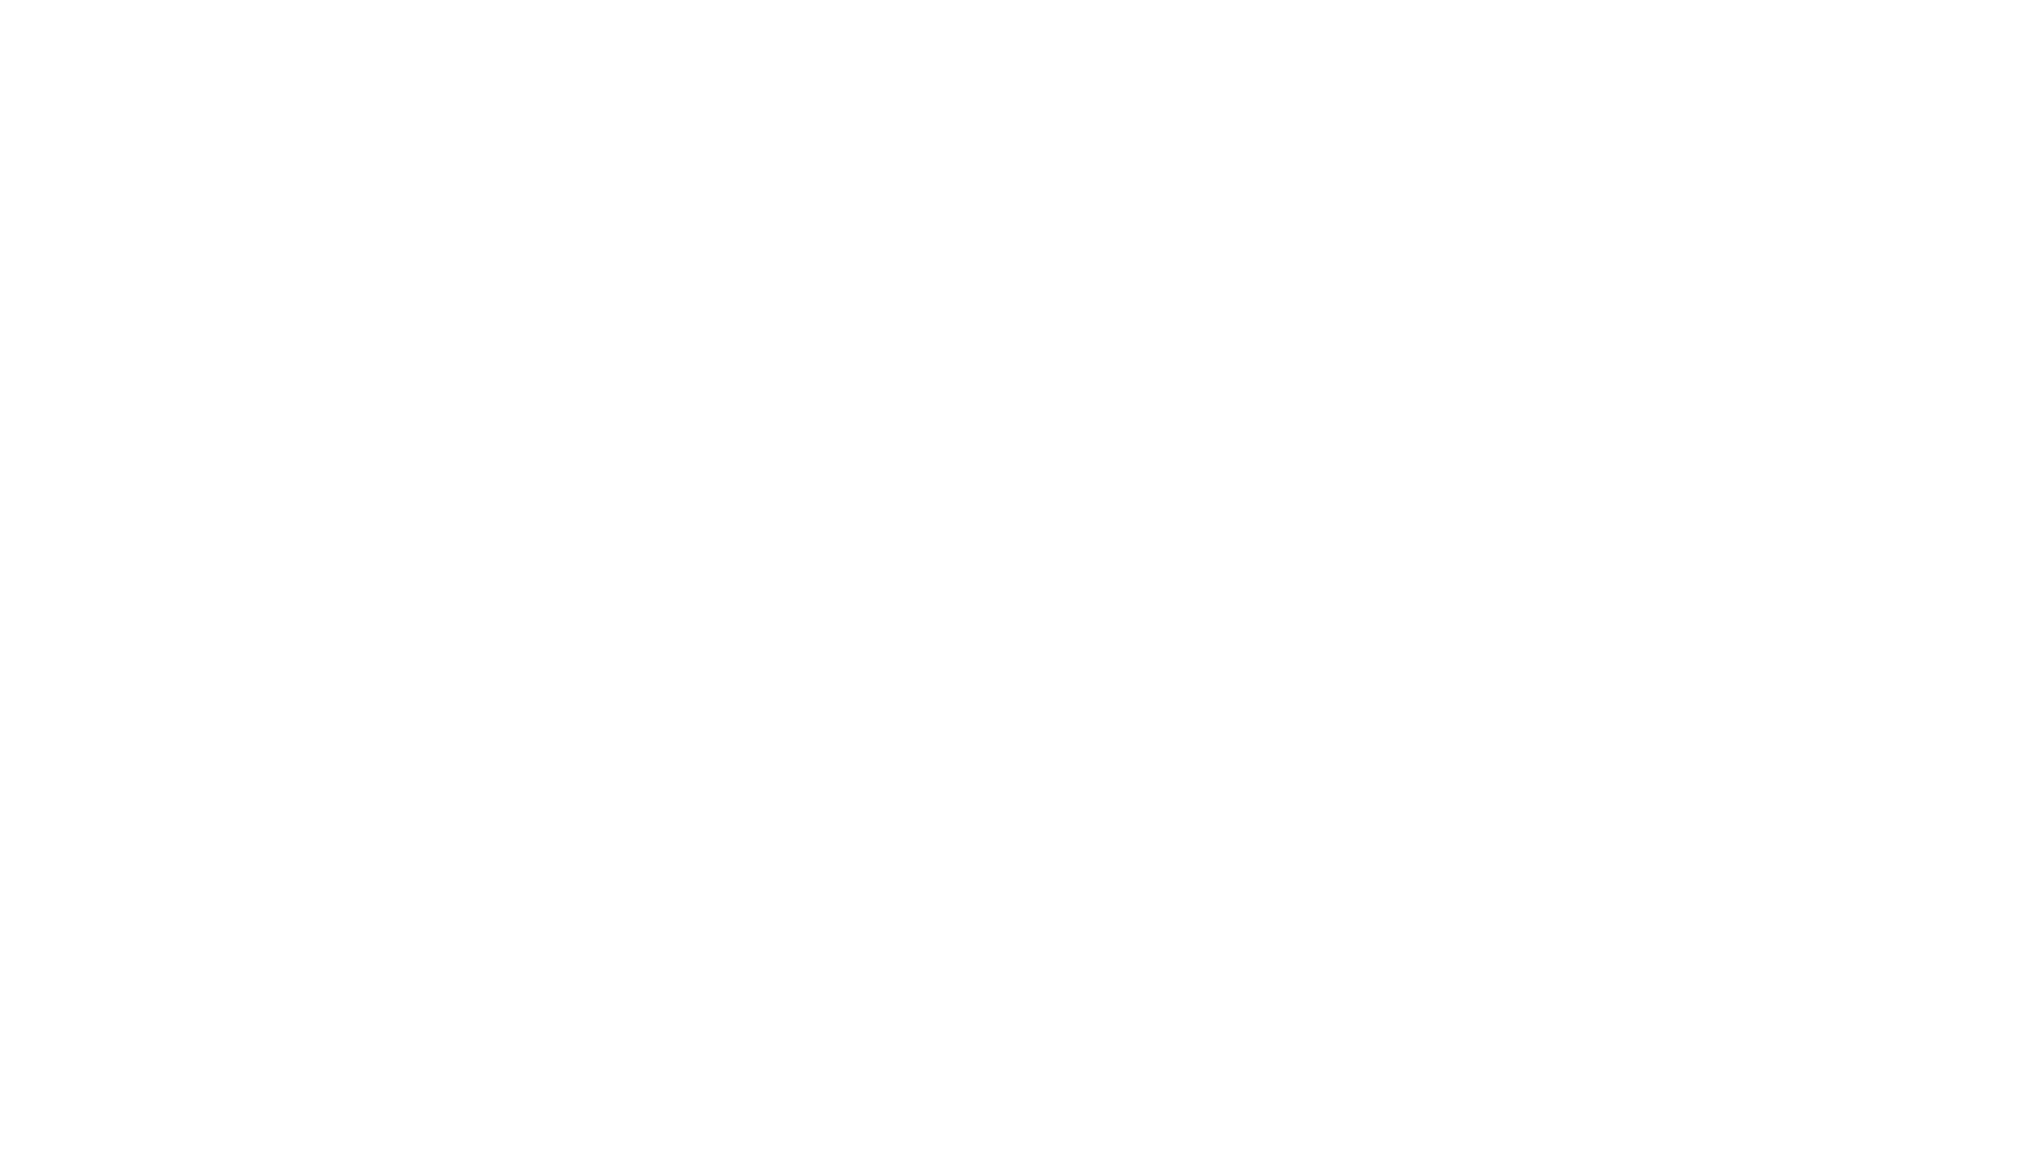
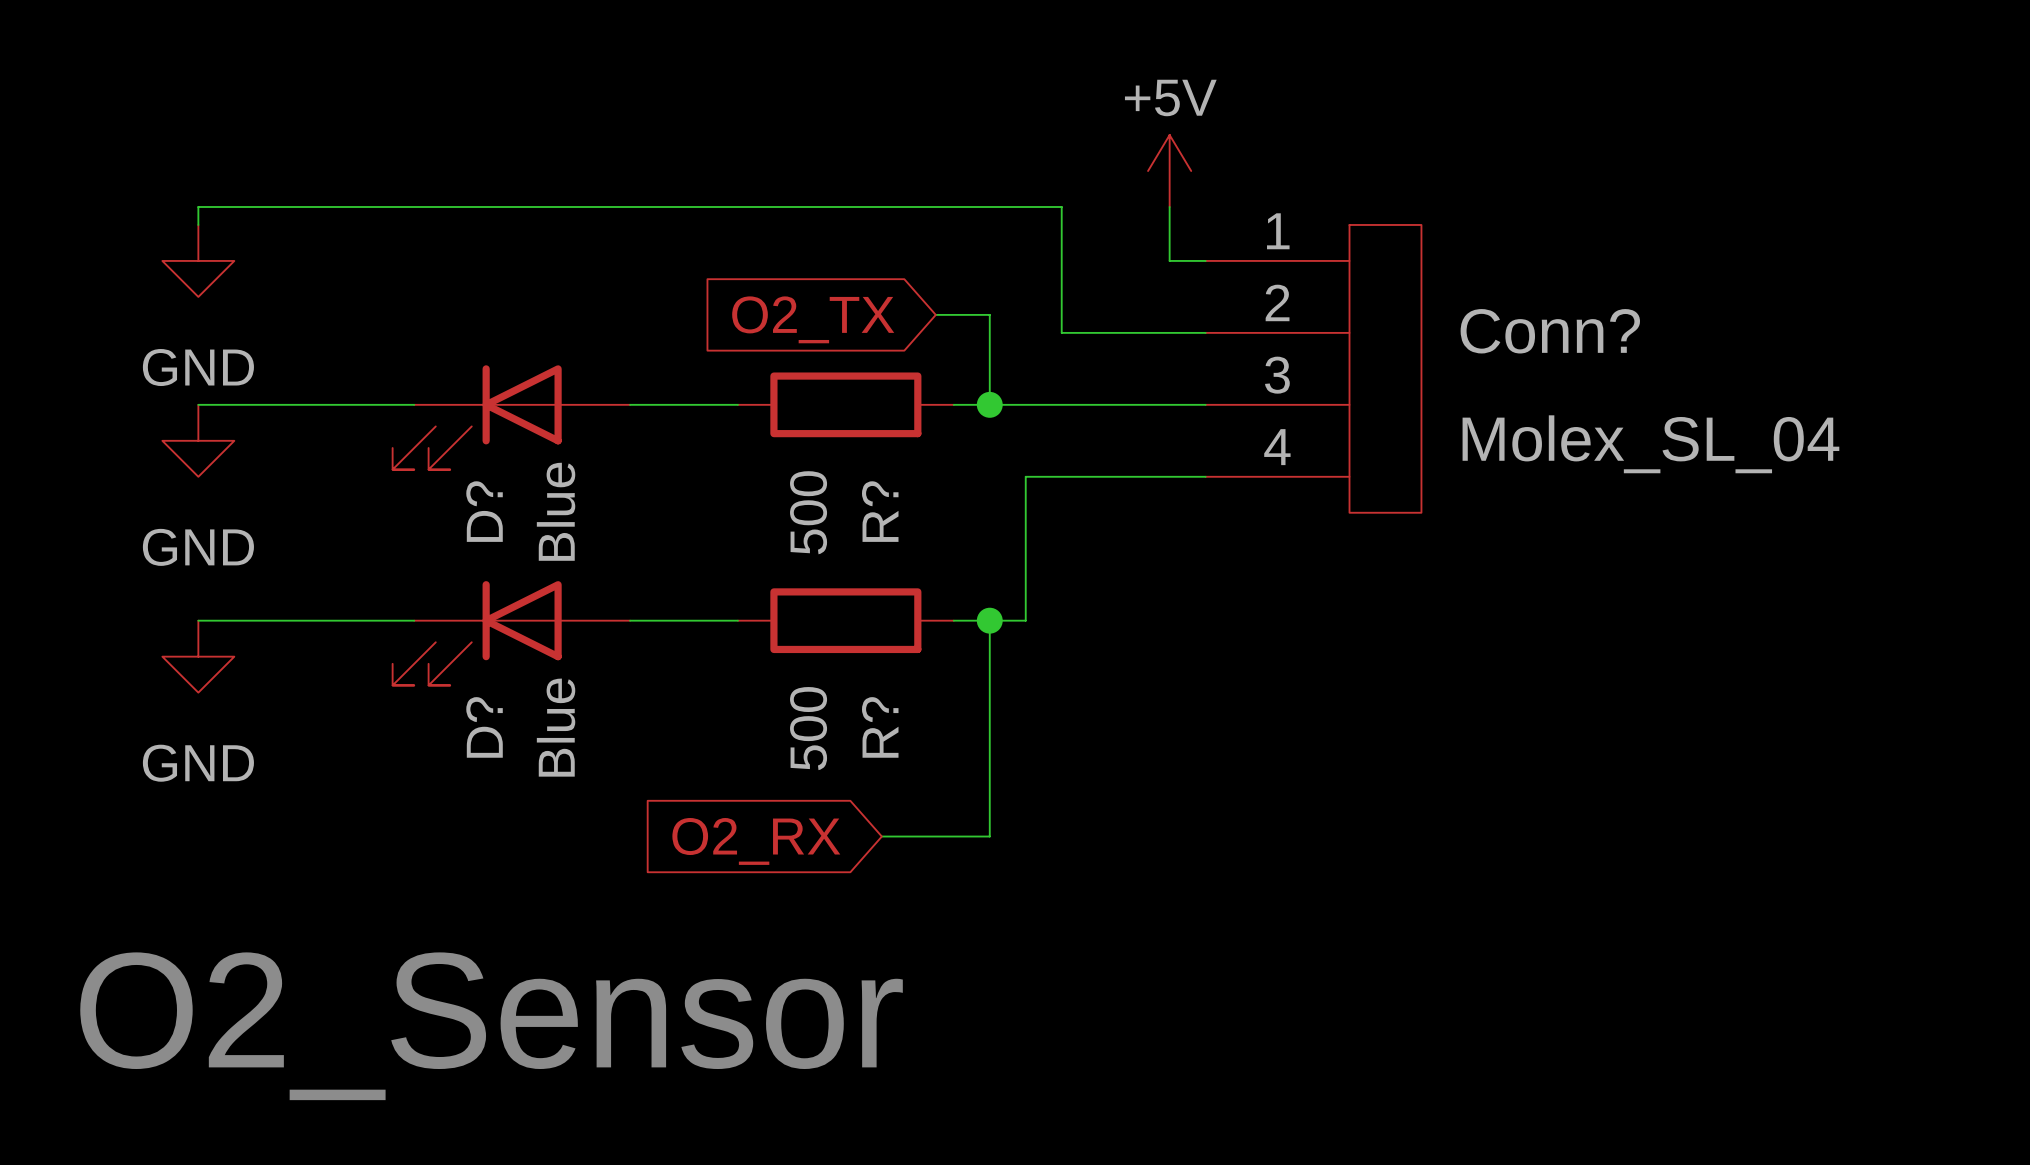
power symbol: none -> +5V (1169, 171)
wire: none -> (1169, 206) (1169, 260) (1205, 260)
wire: none -> (198, 224) (198, 206) (1061, 206) (1061, 332) (1205, 332)
power symbol: none -> GND (198, 260)
wire: none -> (935, 314) (989, 314) (989, 404)
global label: none -> O2_TX (813, 319)
Conn?: none -> Molex_SL_04 (1313, 368)
wire: none -> (198, 404) (414, 404)
wire: none -> (630, 404) (737, 404)
R?: none -> 500 (845, 404)
wire: none -> (953, 404) (1205, 404)
junction: none -> (989, 404)
D?: none -> Blue (511, 417)
power symbol: none -> GND (198, 440)
wire: none -> (1205, 476) (1025, 476) (1025, 620) (953, 620)
wire: none -> (198, 620) (414, 620)
wire: none -> (630, 620) (737, 620)
R?: none -> 500 (845, 620)
wire: none -> (989, 620) (989, 836) (881, 836)
junction: none -> (989, 620)
D?: none -> Blue (511, 633)
power symbol: none -> GND (198, 656)
global label: none -> O2_RX (756, 841)
text: none -> O2_Sensor (491, 1026)

